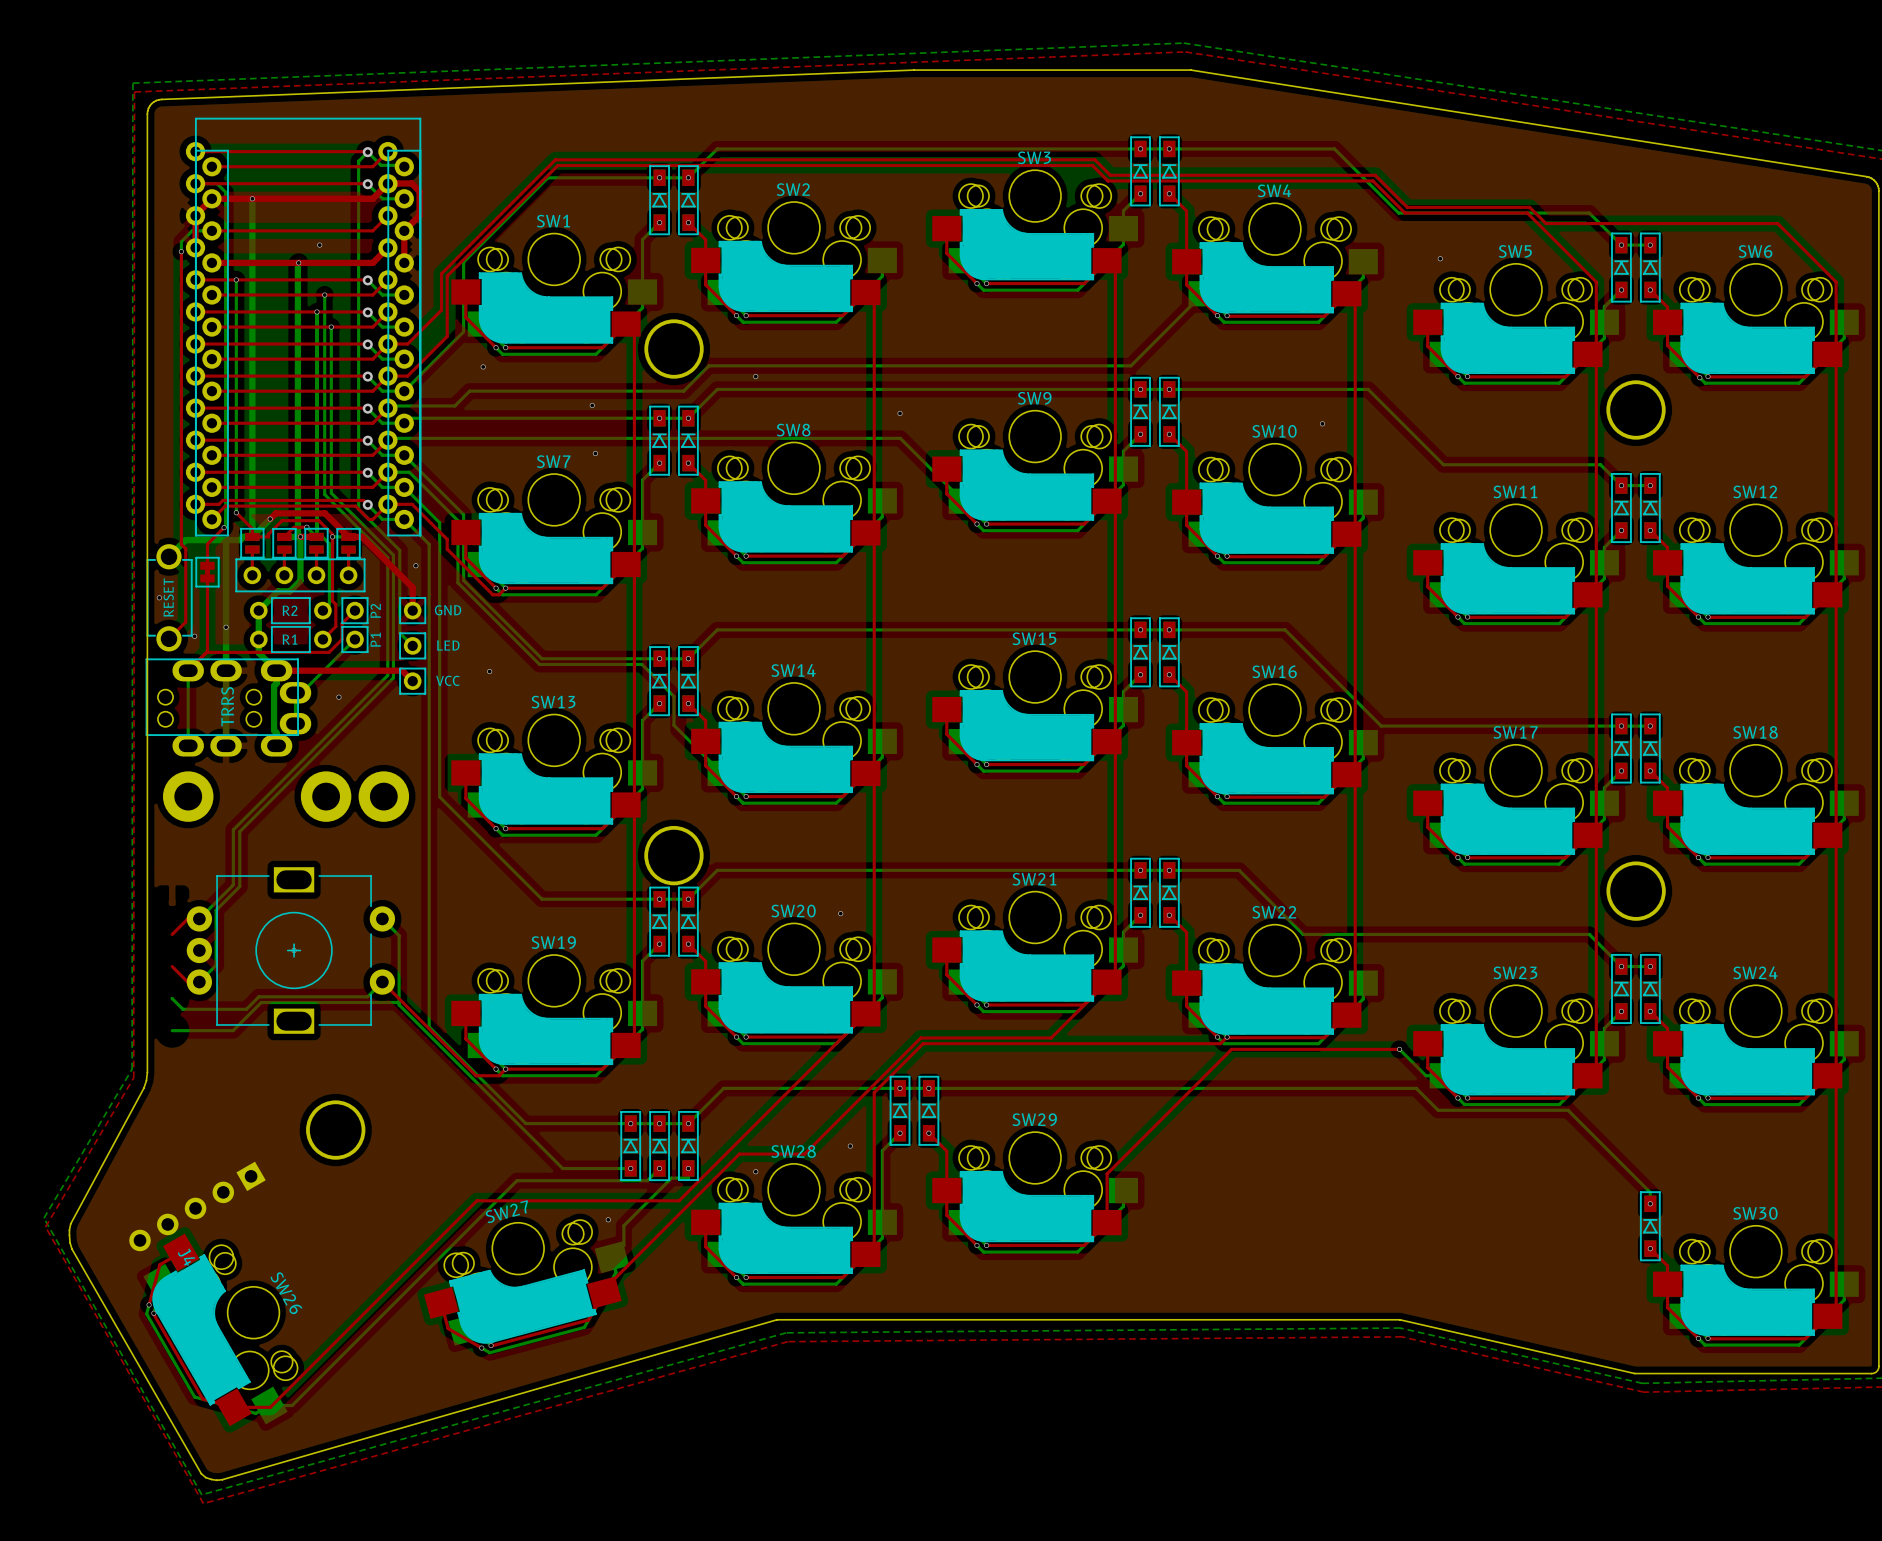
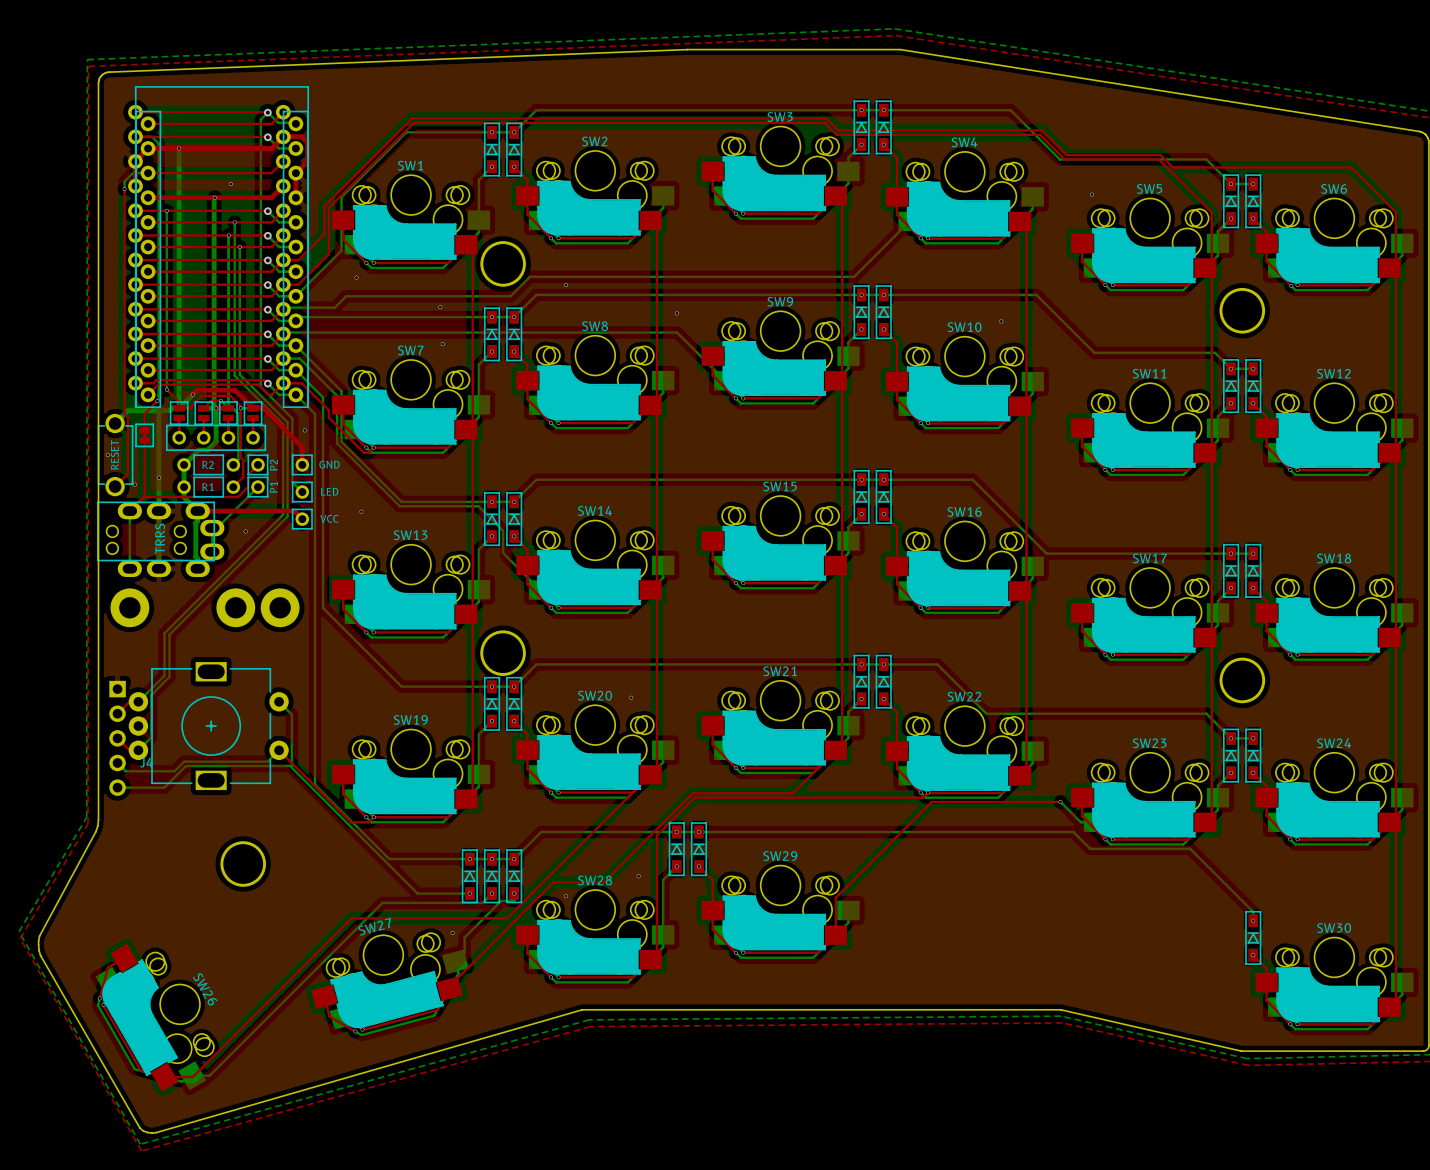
J4 rotation: 0° (197, 1206) -> 60° counterclockwise (117, 738)
J4 position: (197, 1206) -> (117, 738)

